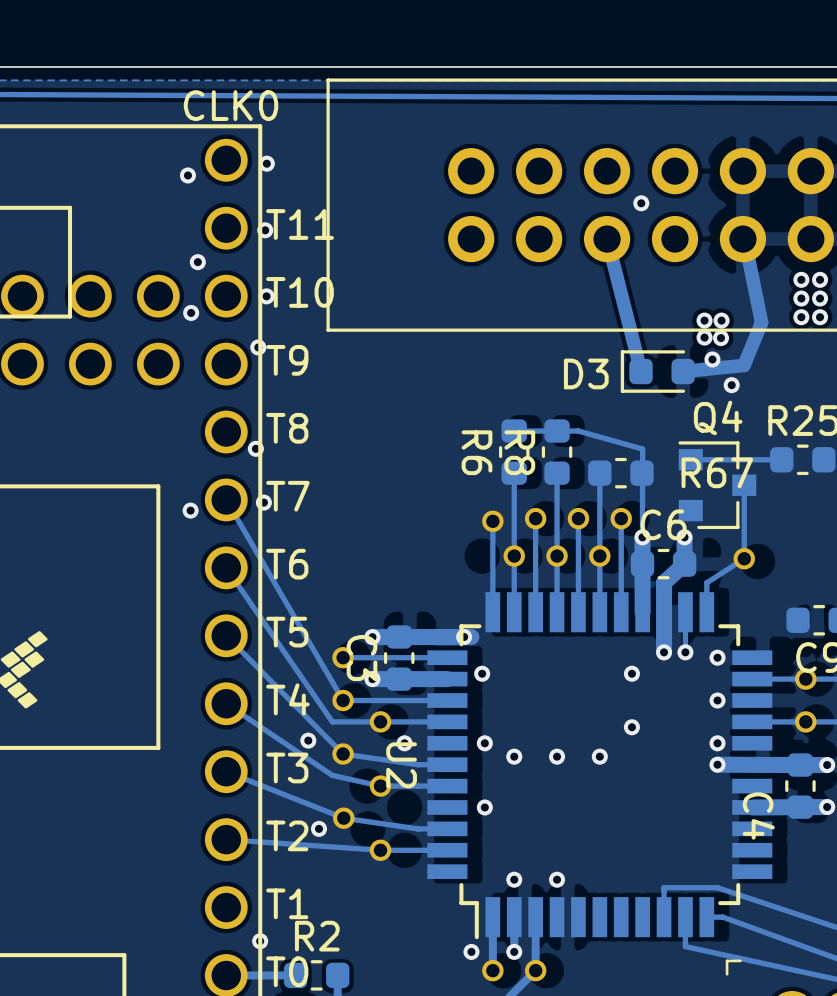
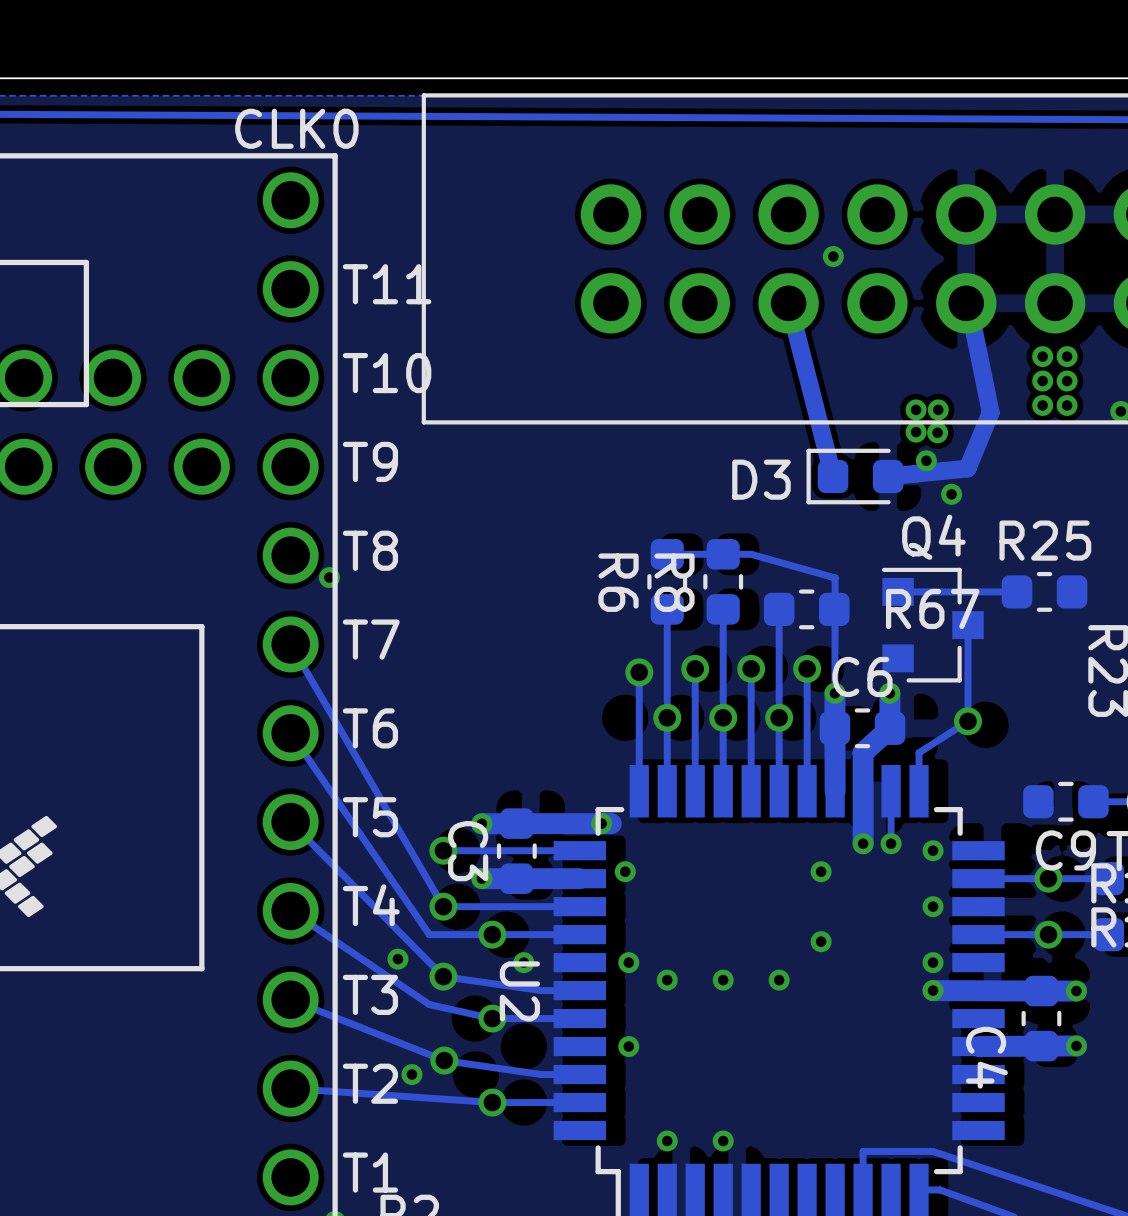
via: (266, 163) -> none
via: (187, 175) -> none
via: (265, 230) -> none
via: (197, 262) -> none
via: (266, 296) -> none
via: (191, 312) -> none
via: (258, 347) -> none
via: (263, 502) -> none
via: (190, 510) -> none

